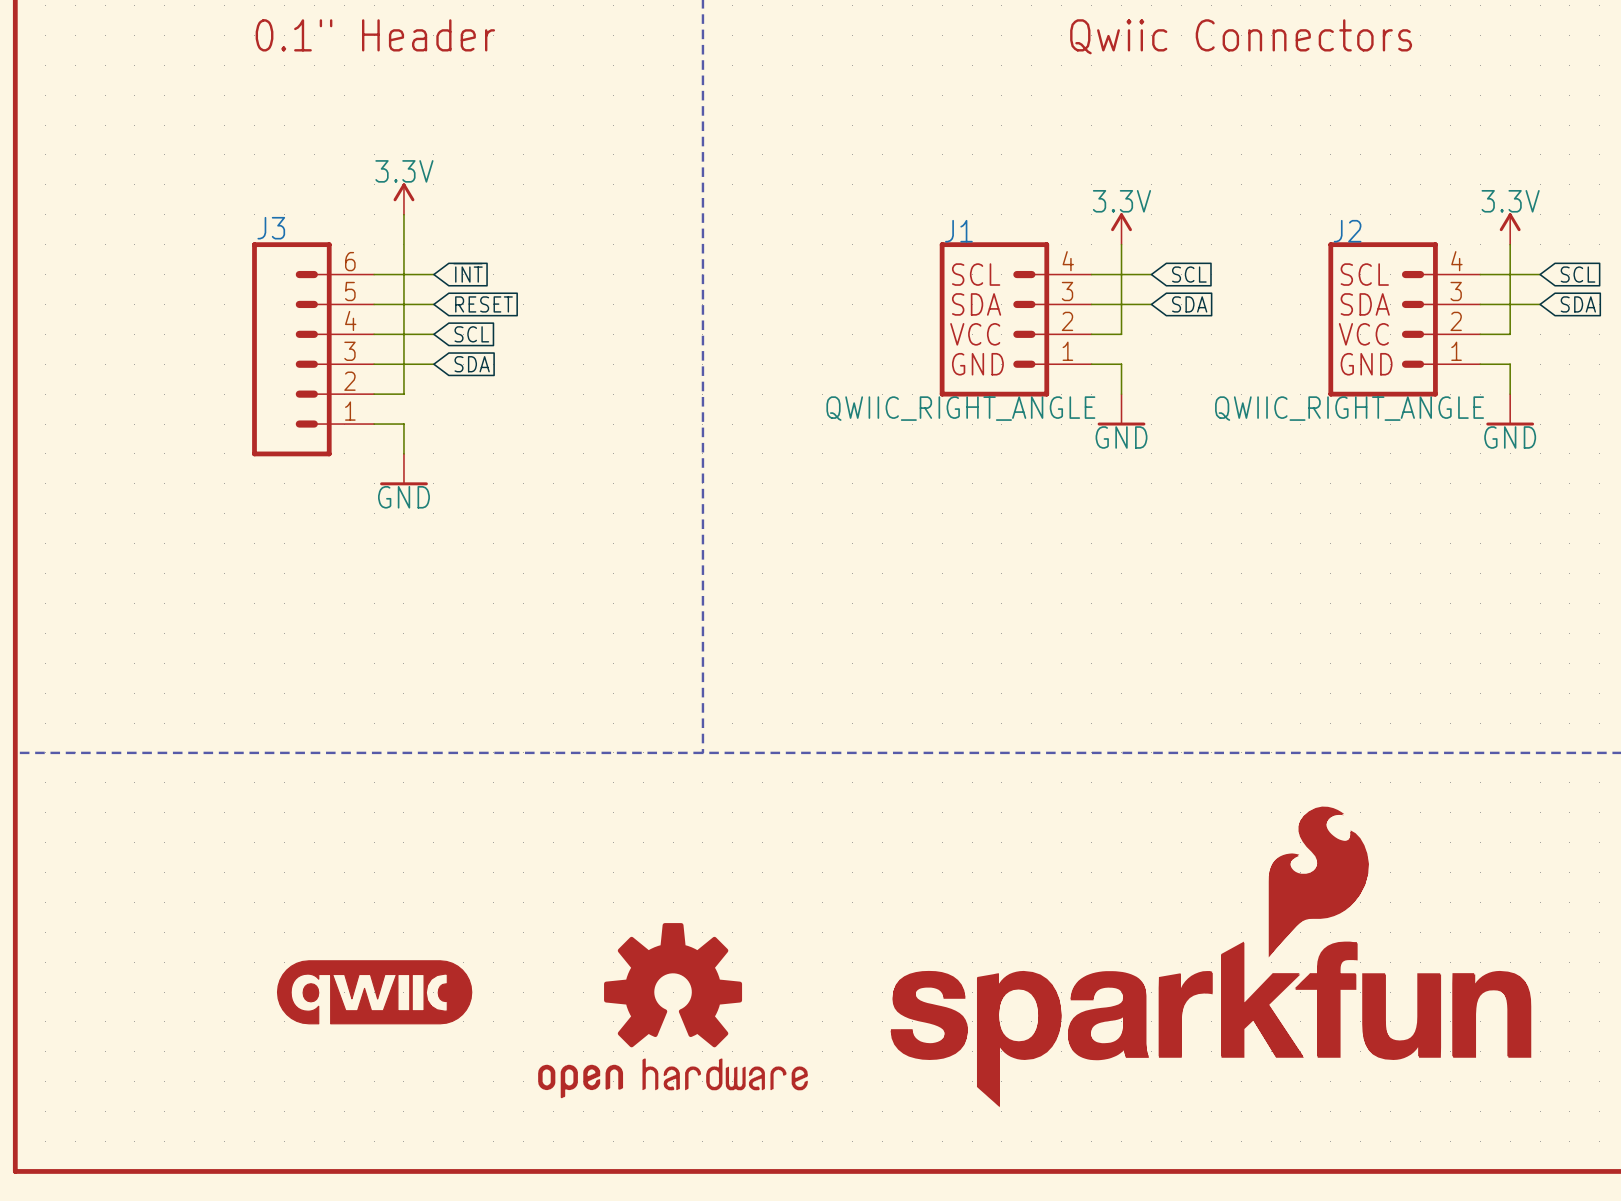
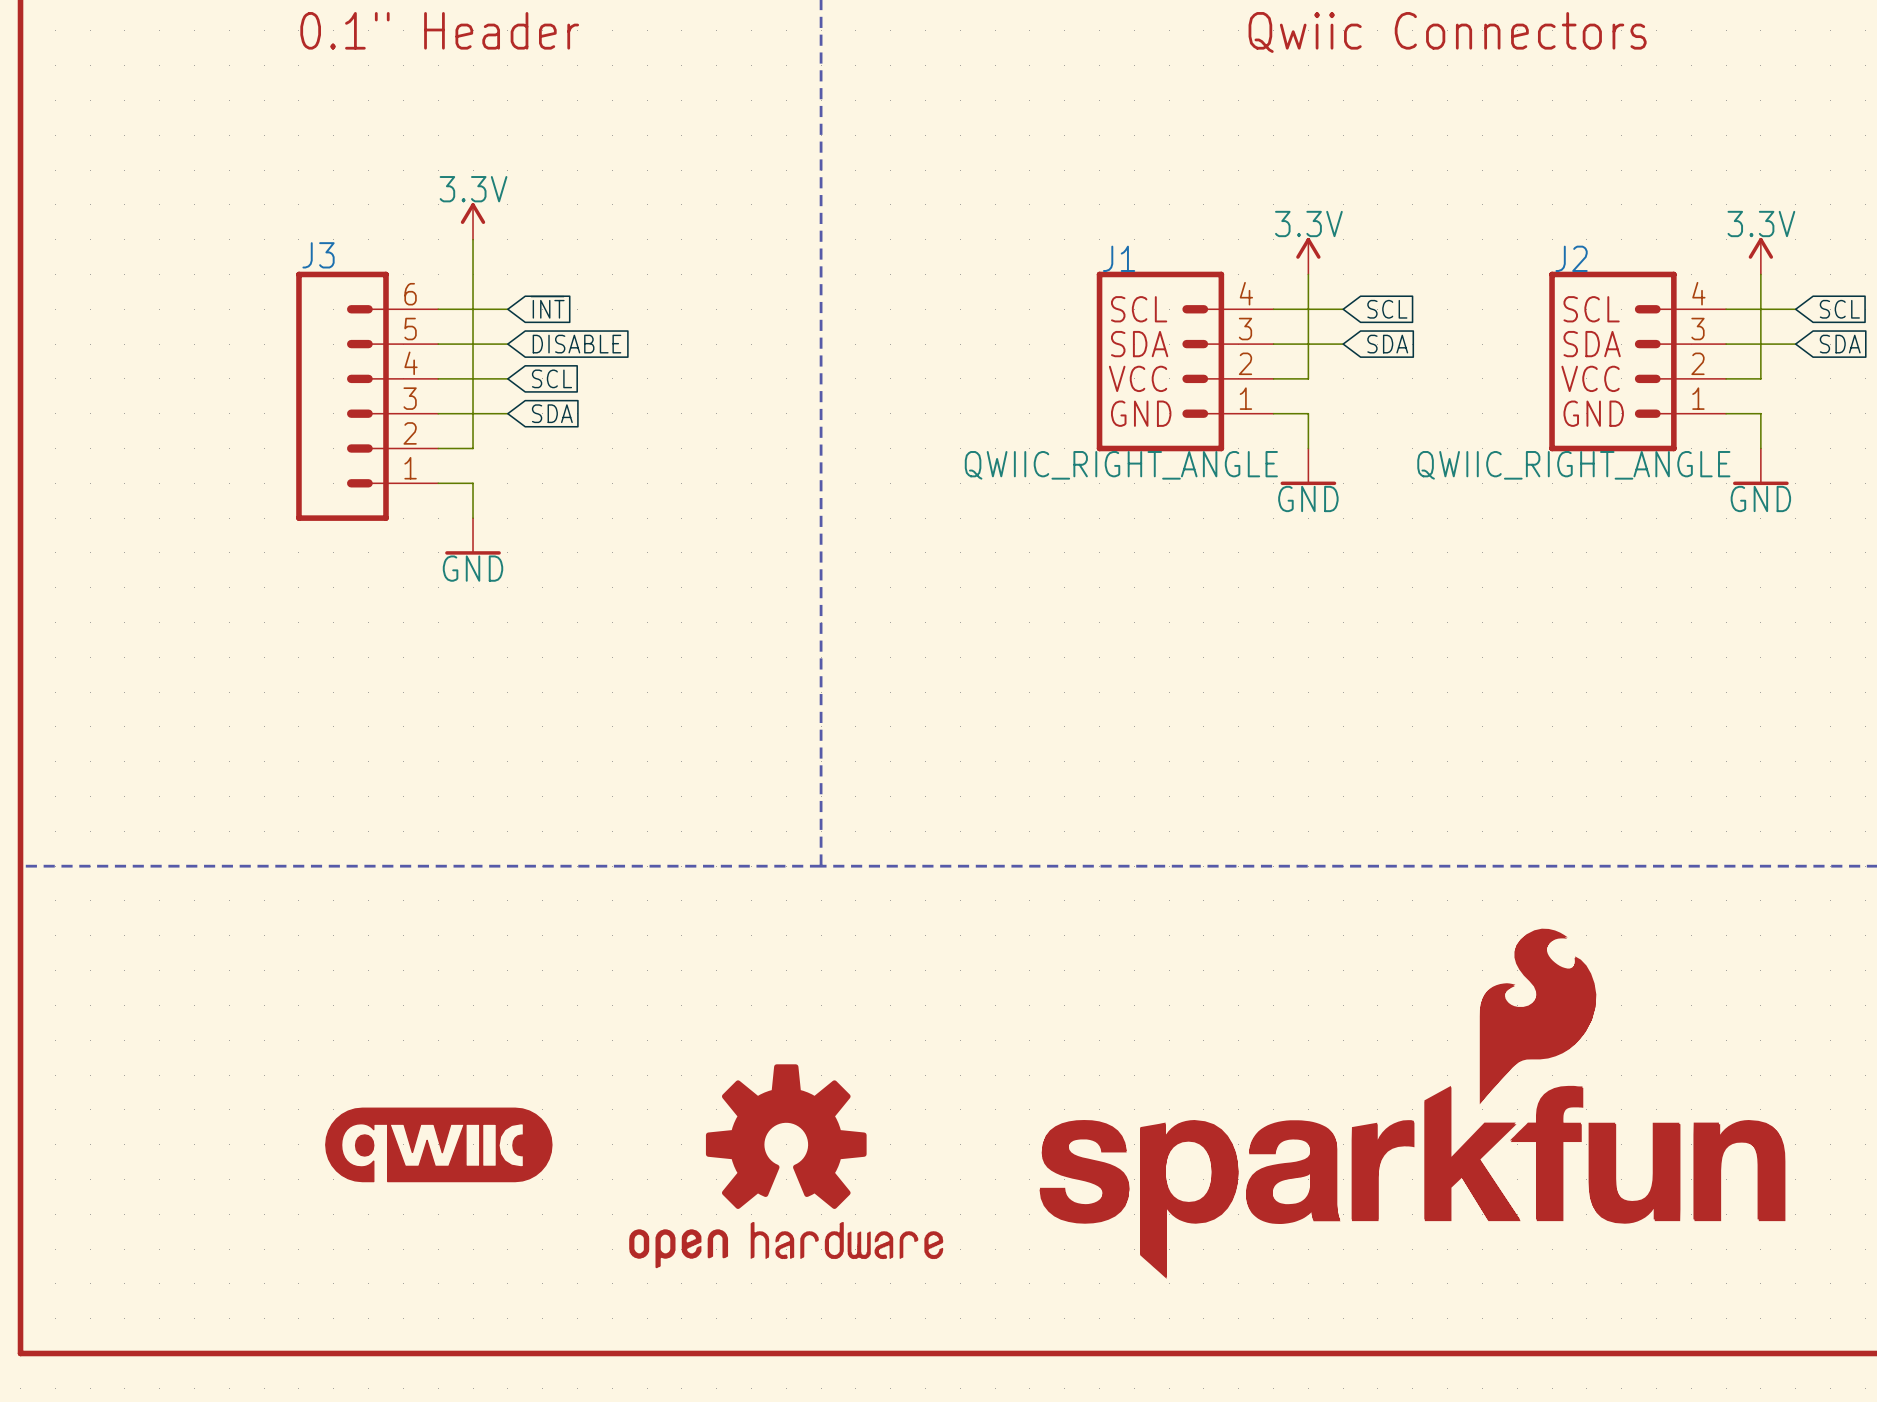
global label: RESET (483, 304) -> DISABLE (576, 344)

